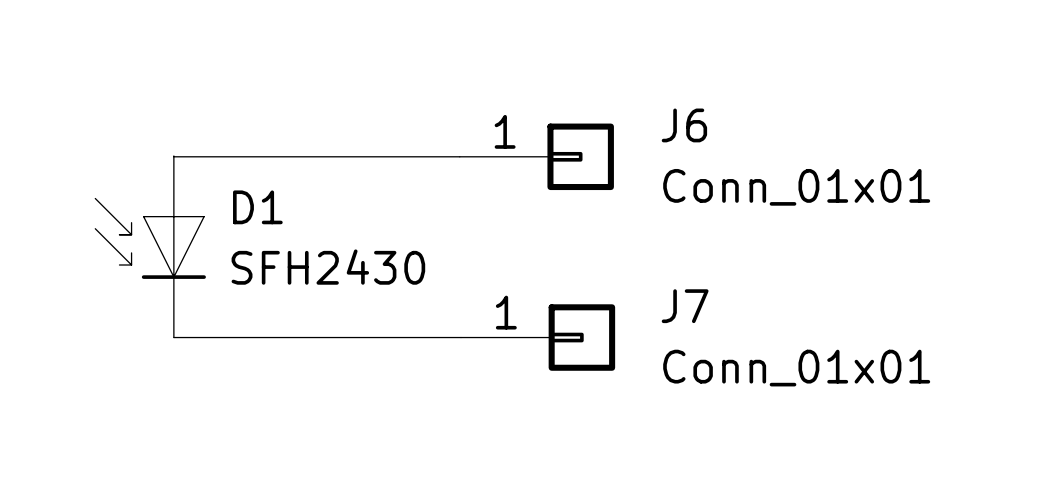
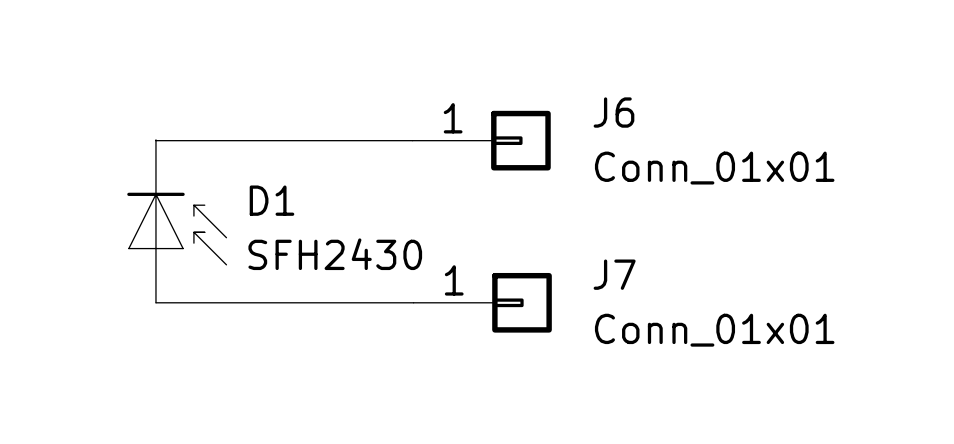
D1 rotation: 0° (150, 238) -> 180° (176, 228)

